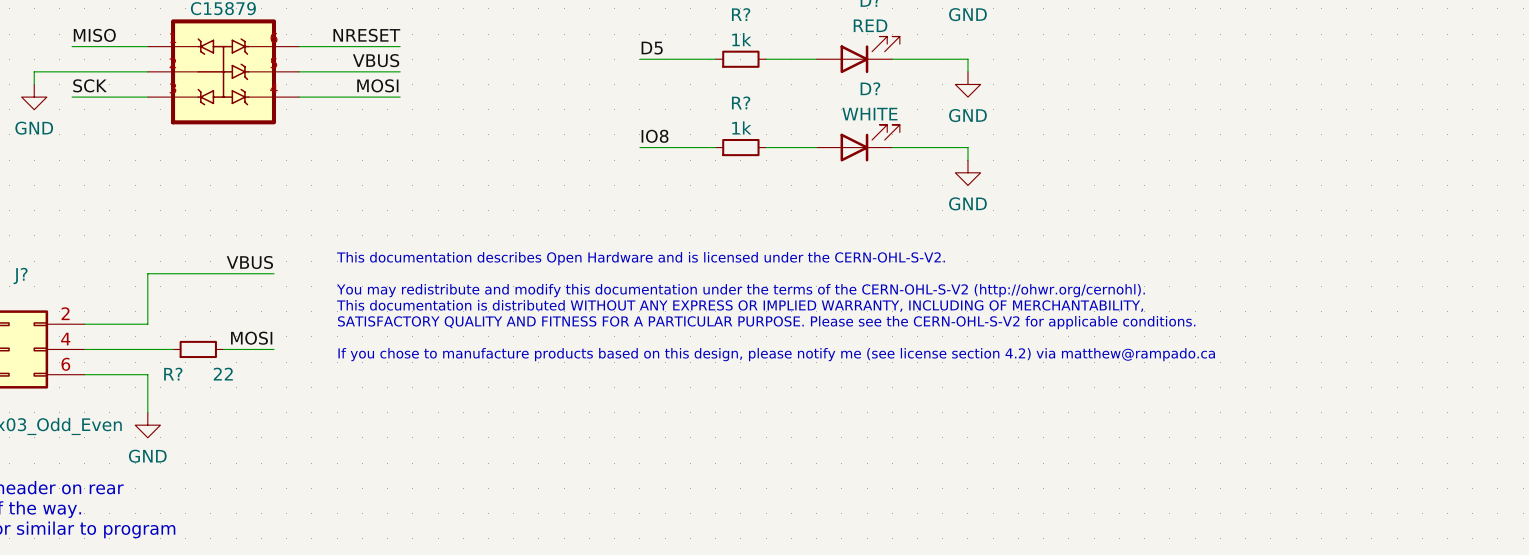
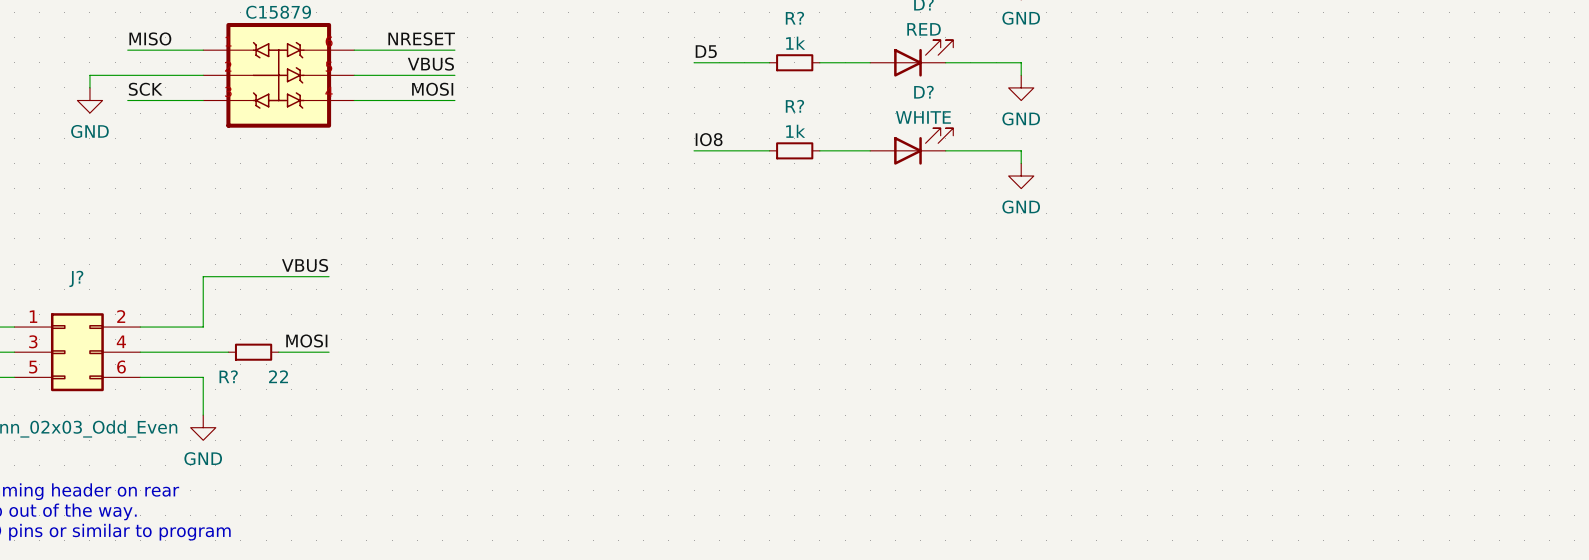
text: This documentation describes Open Hardware and is licensed under the CERN-OHL-S-V2. (641, 258) -> none
text: You may redistribute and modify this documentation under the terms of the CERN-OHL-S-V2 (http://ohwr.org/cernohl). (740, 290) -> none
text: This documentation is distributed WITHOUT ANY EXPRESS OR IMPLIED WARRANTY, INCLUDING OF MERCHANTABILITY, (740, 306) -> none
text: SATISFACTORY QUALITY AND FITNESS FOR A PARTICULAR PURPOSE. Please see the CERN-OHL-S-V2 for applicable conditions. (766, 322) -> none
text: If you chose to manufacture products based on this design, please notify me (see license section 4.2) via matthew@rampado.ca (776, 354) -> none

